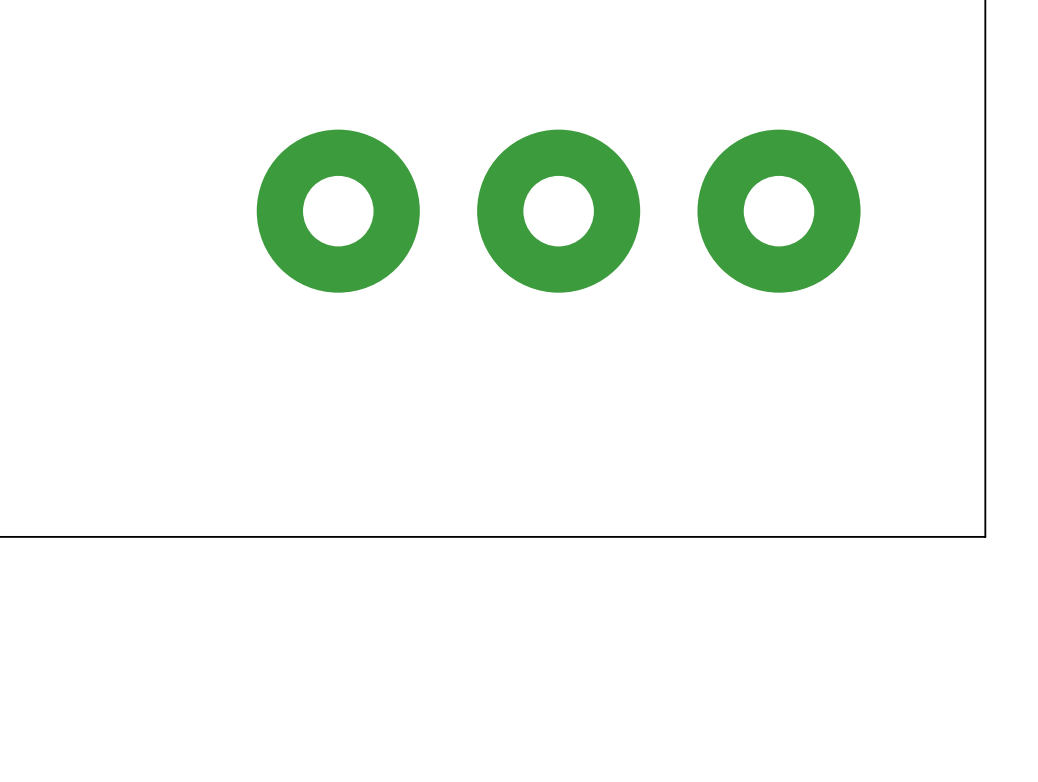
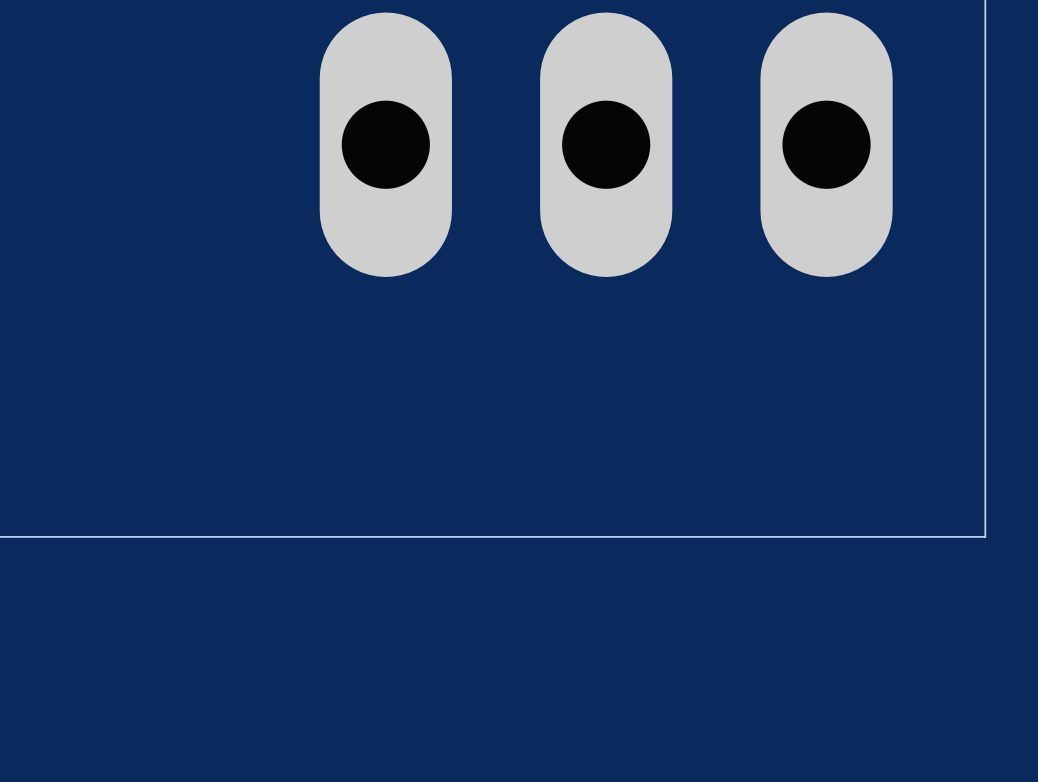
part footprint: [256, 129, 861, 293] -> [319, 12, 893, 277]

